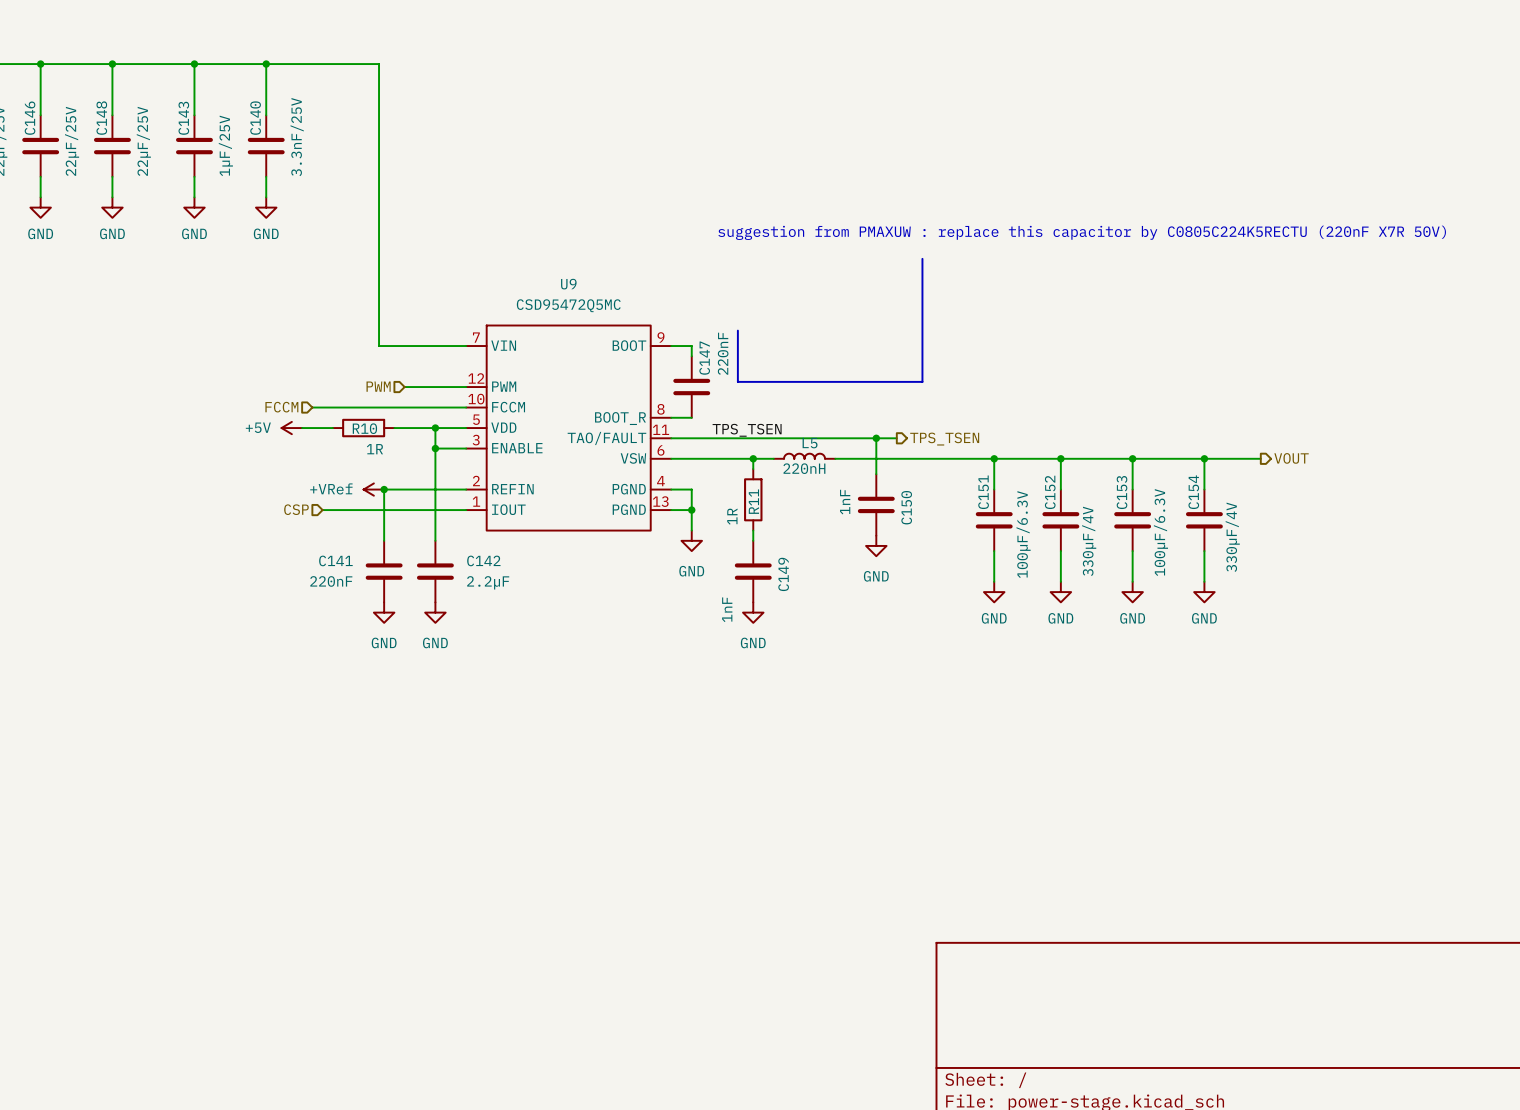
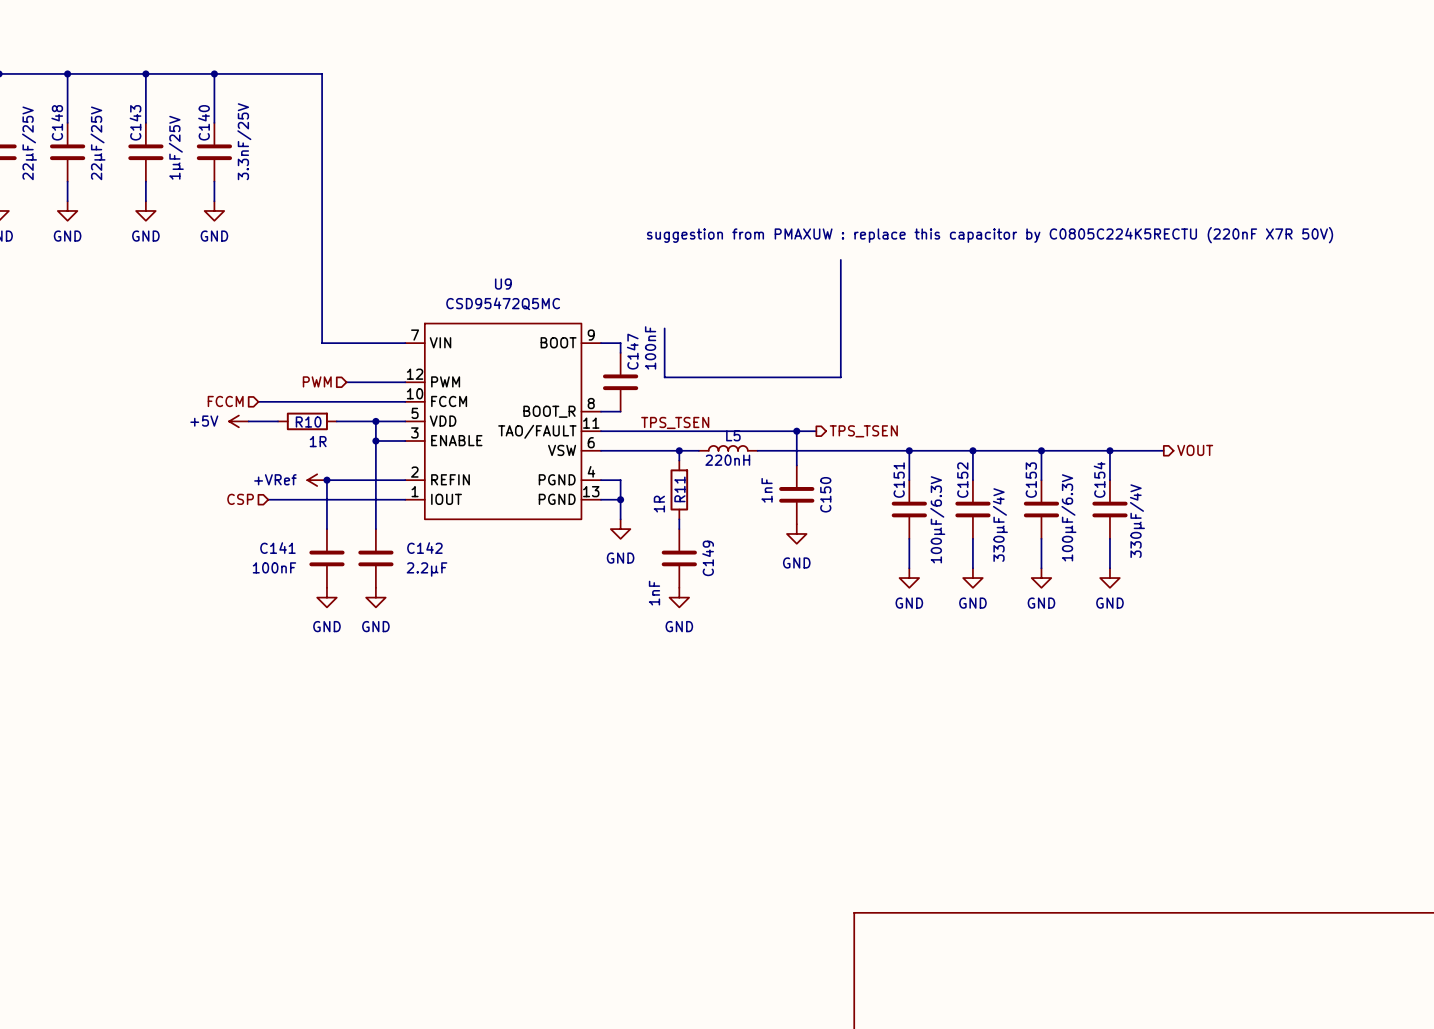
C147 value: 220nF (723, 353) -> 100nF (650, 347)
C141 value: 220nF (331, 581) -> 100nF (274, 567)

